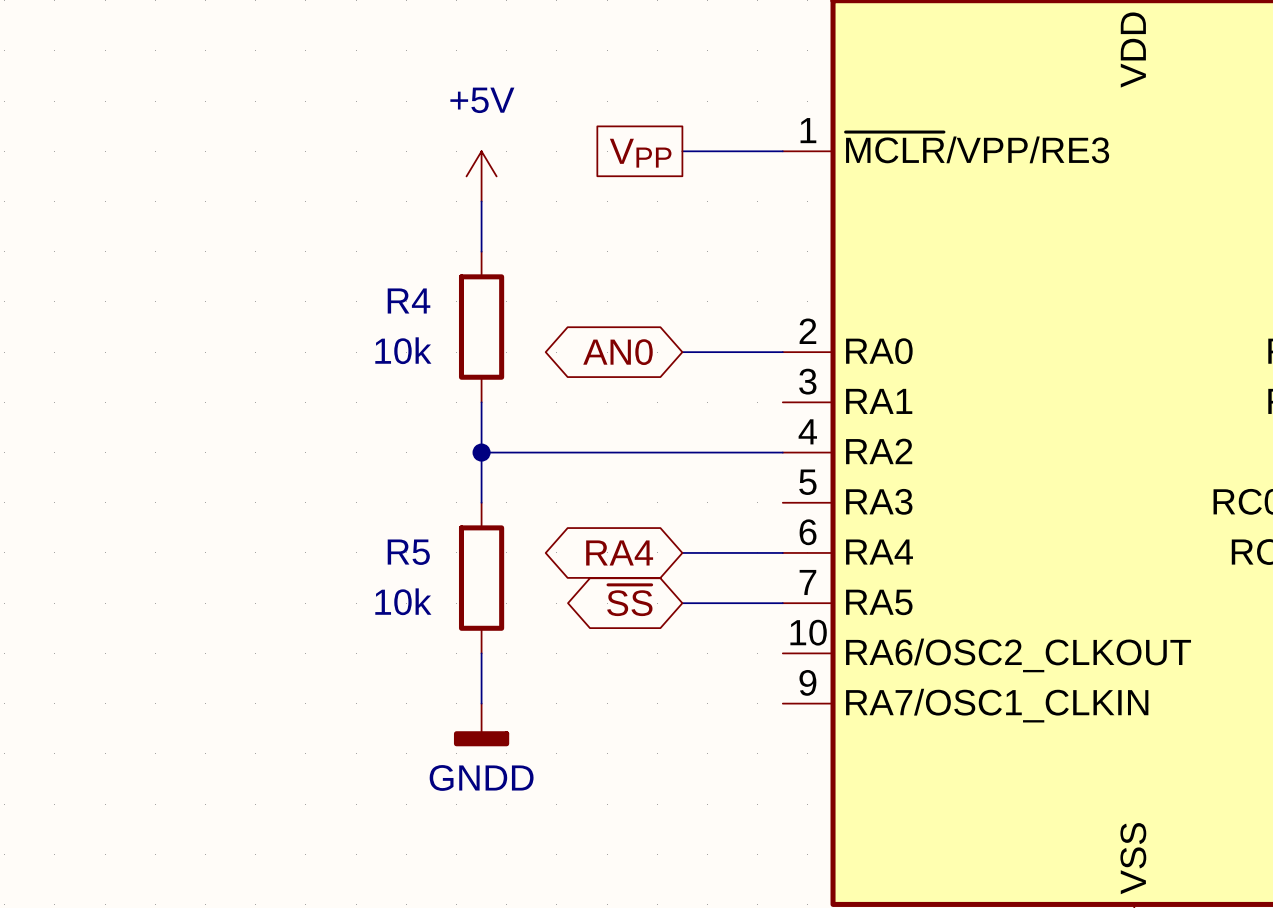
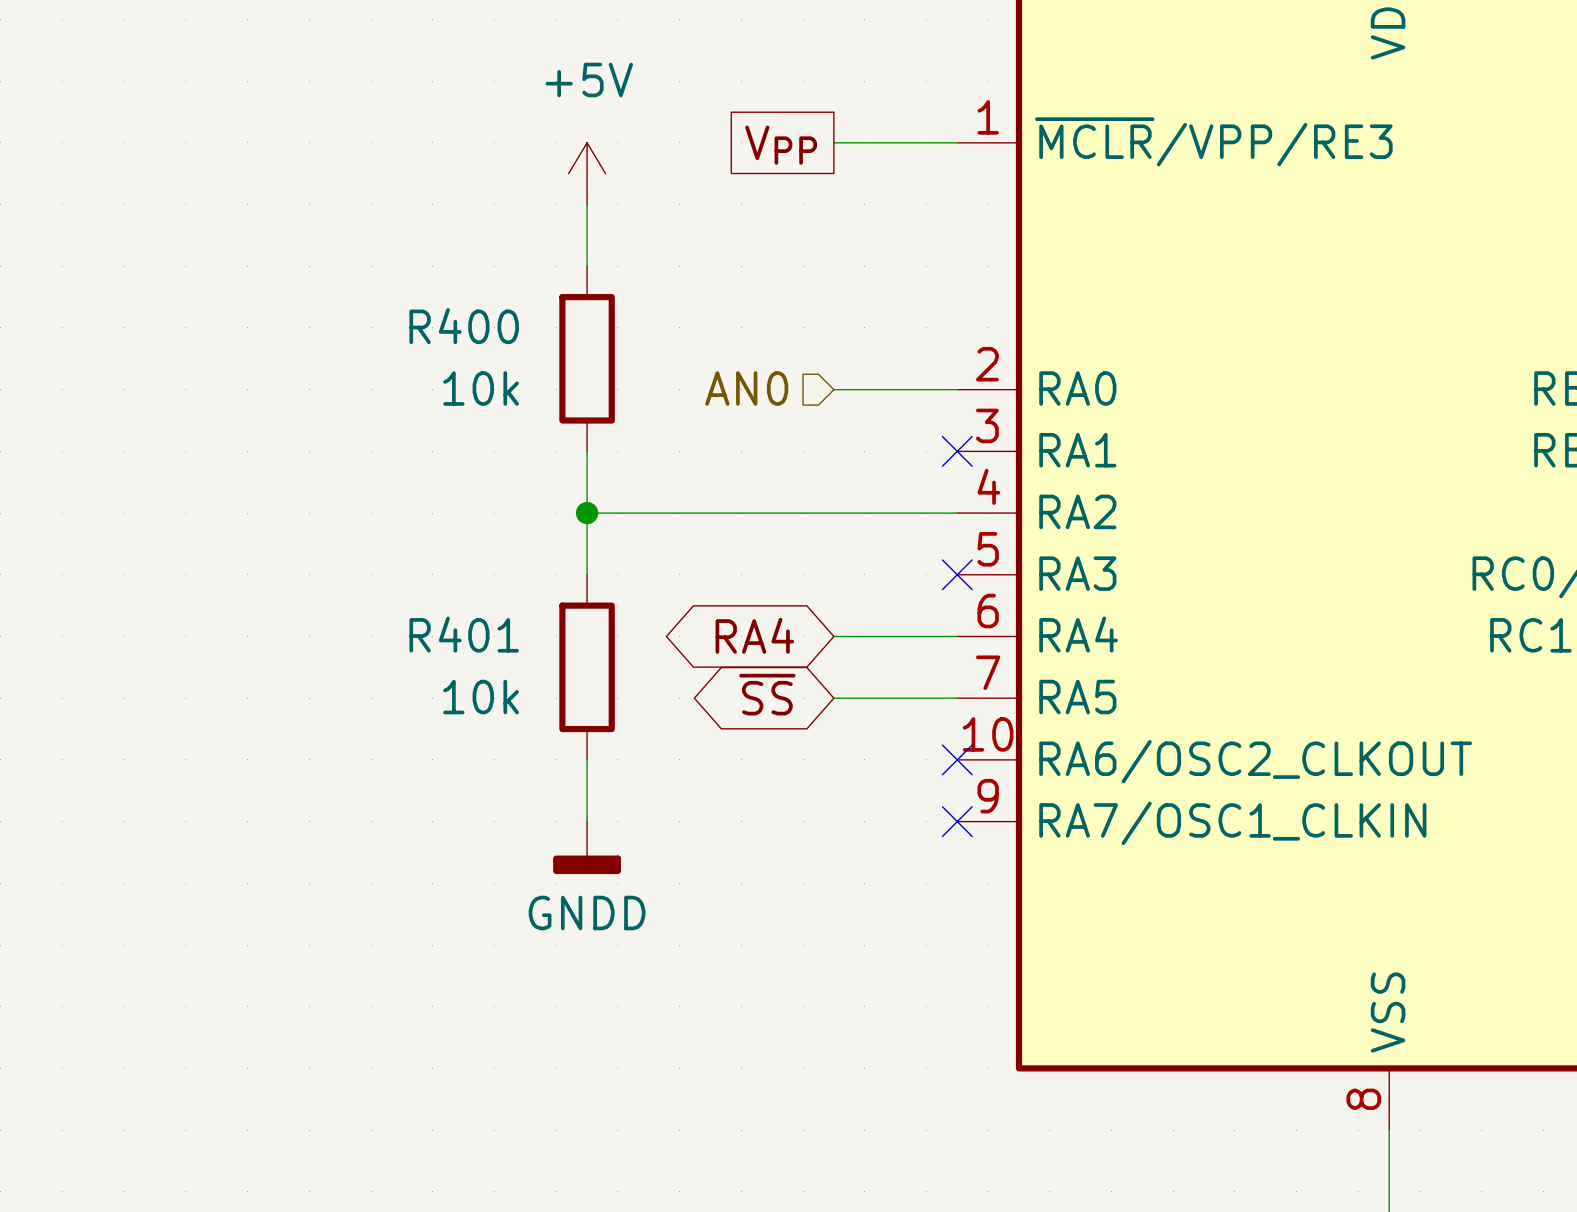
R4 name: R4 (409, 300) -> R400 (464, 326)
hierarchical label: none -> AN0 (746, 388)
global label: AN0 (617, 352) -> none
no-connect mark: none -> (957, 451)
no-connect mark: none -> (957, 574)
R5 name: R5 (408, 552) -> R401 (464, 634)
no-connect mark: none -> (957, 759)
no-connect mark: none -> (957, 821)

